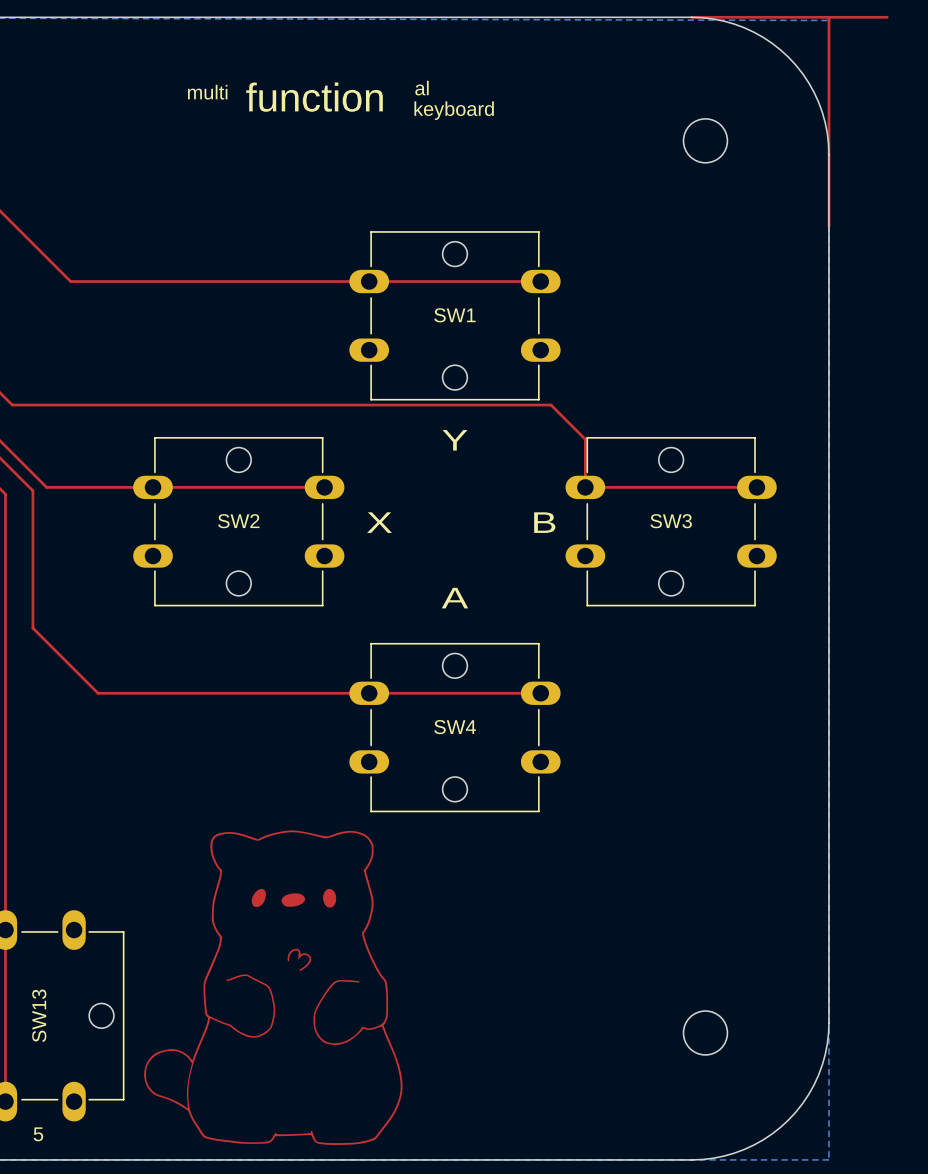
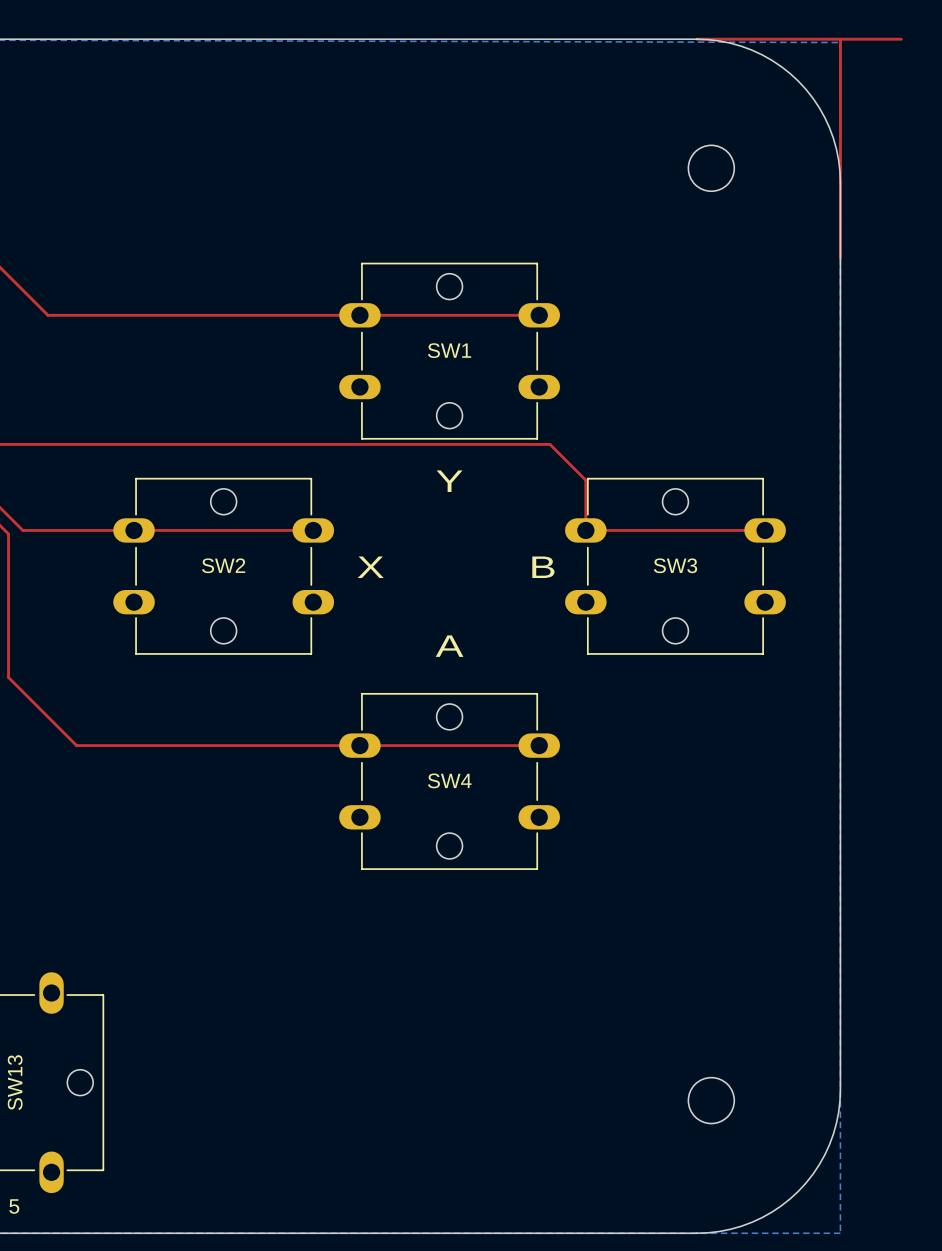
text: al (422, 88) -> none
text: multi (207, 92) -> none
text: function (314, 97) -> none
text: keyboard (454, 110) -> none
drawing: [144, 830, 403, 1146] -> none

